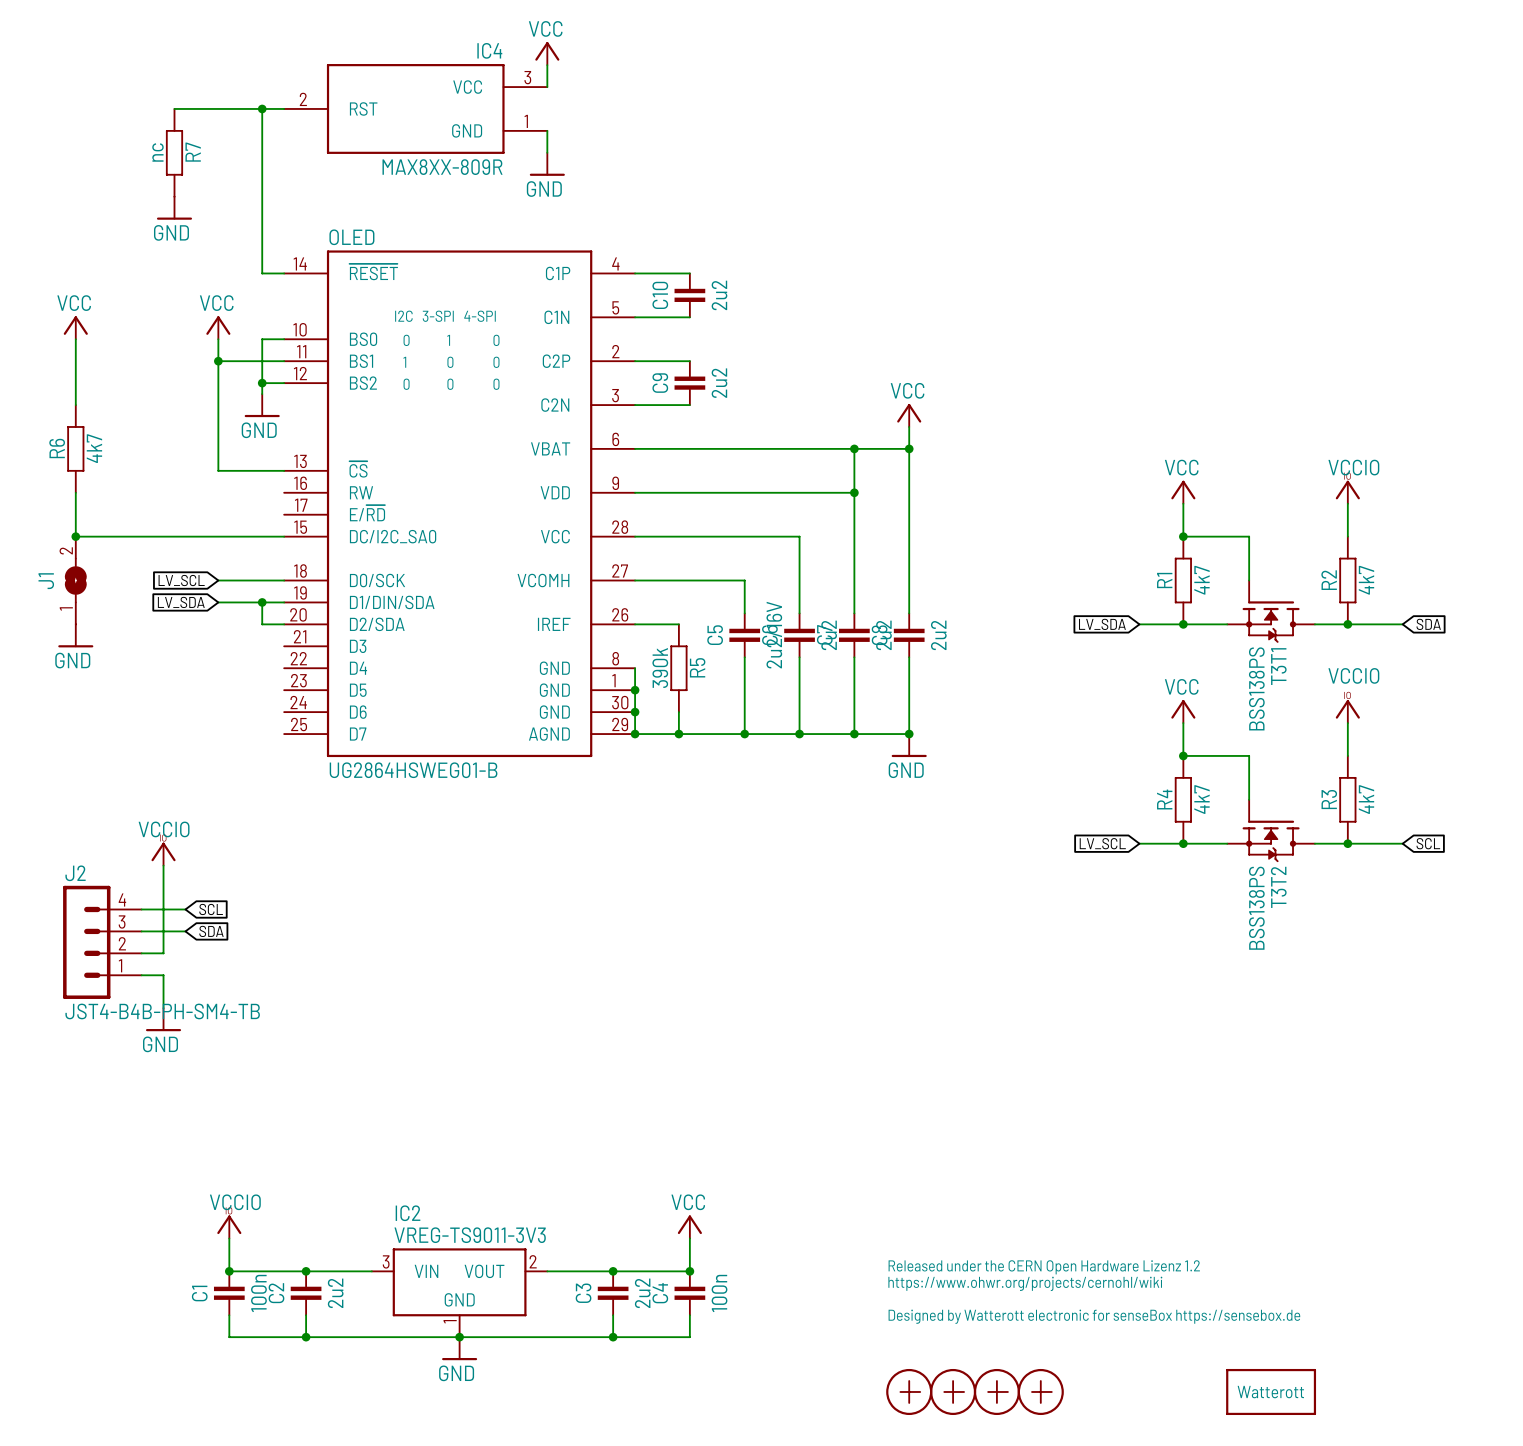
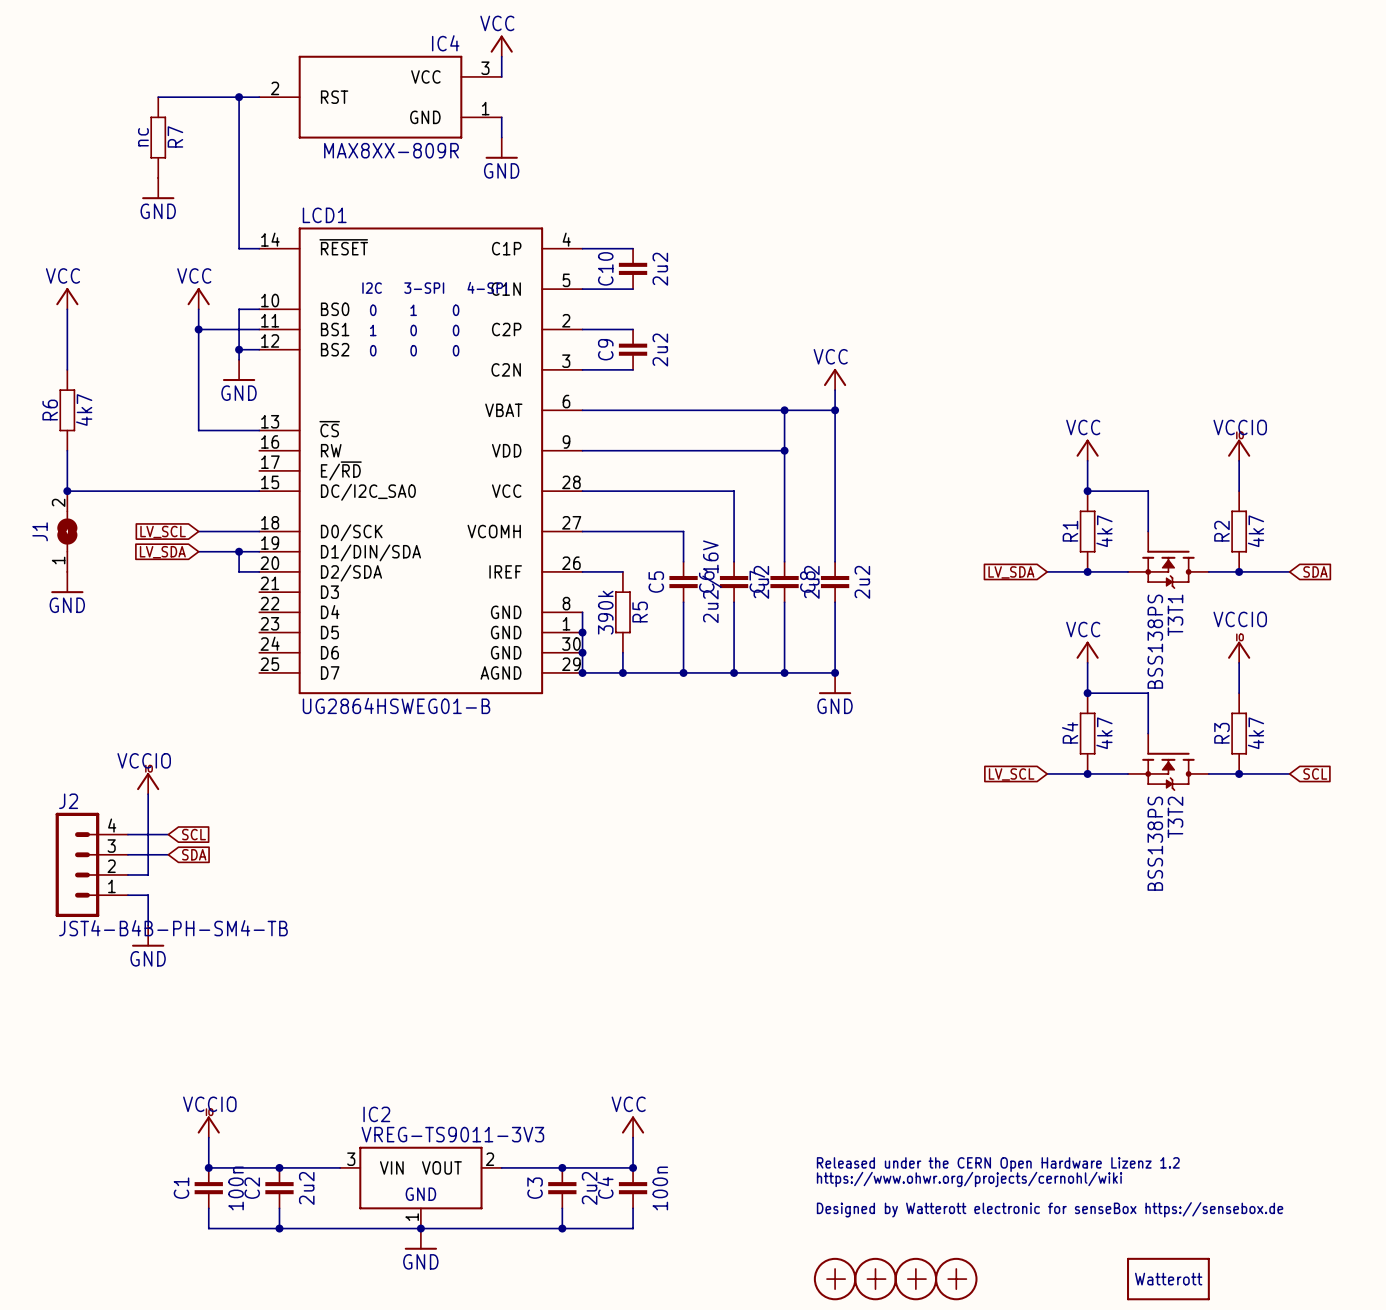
OLED name: OLED (351, 237) -> LCD1 (324, 215)

